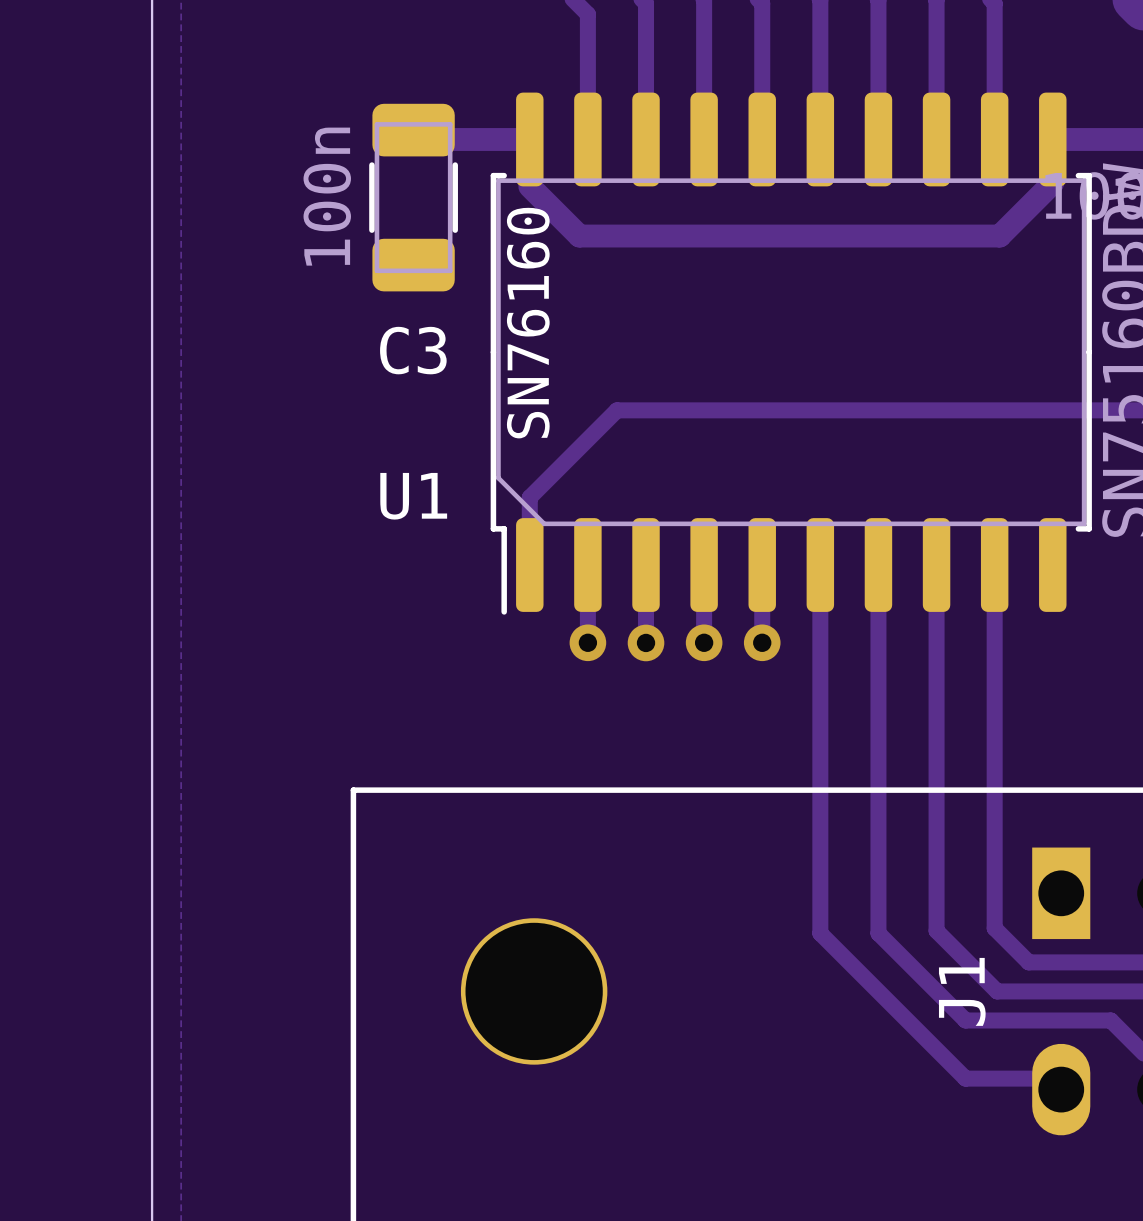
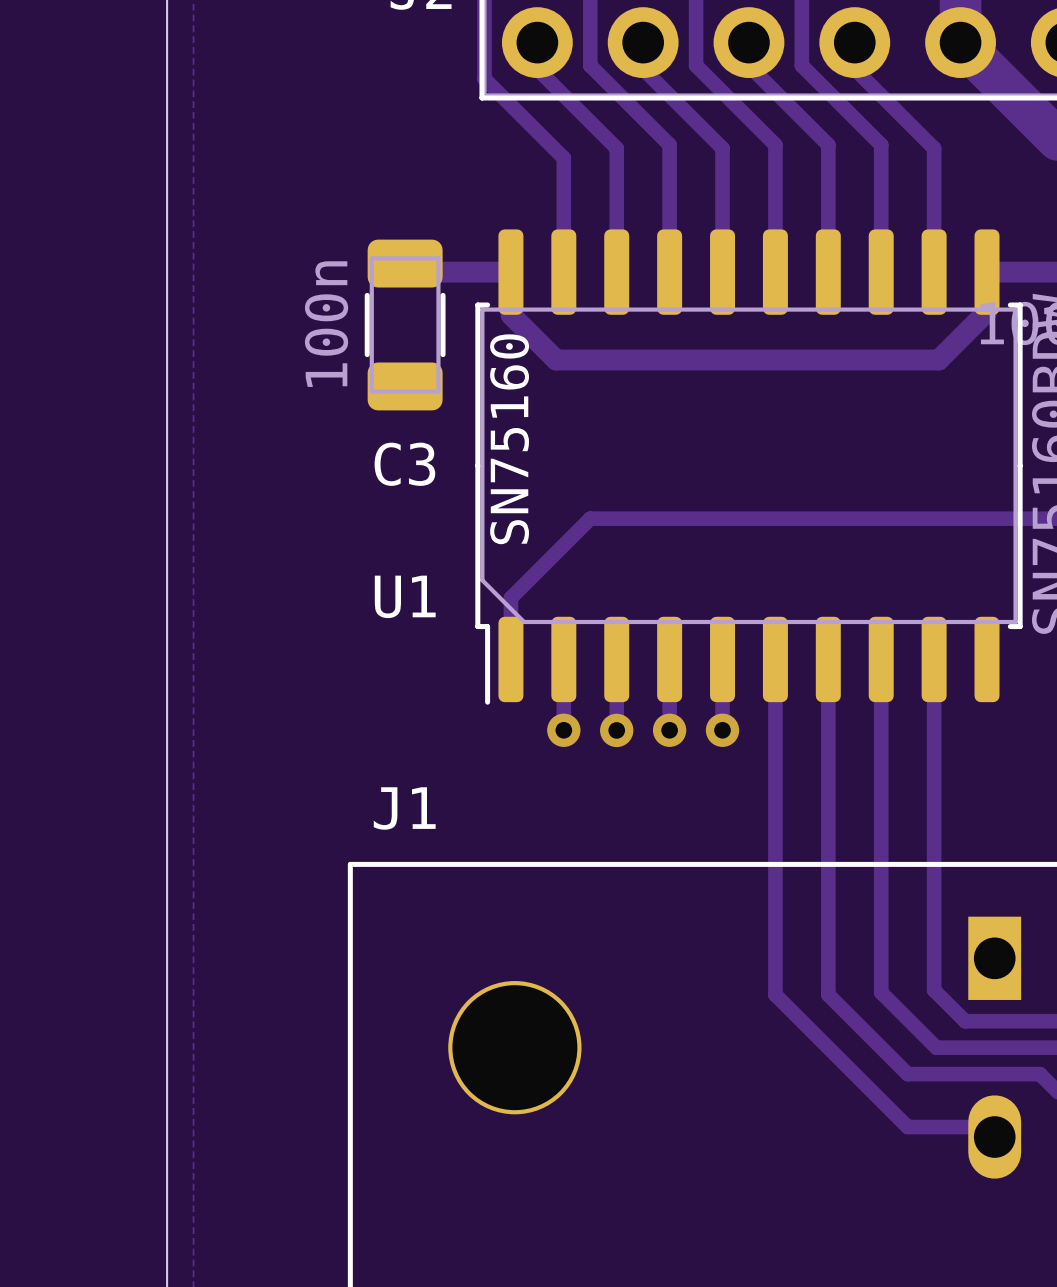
text: SN76160 (528, 323) -> SN75160 (509, 439)
J1 name rotation: 0° (962, 991) -> 90° clockwise (404, 808)
J1 name position: J1 (962, 991) -> J1 (404, 808)

